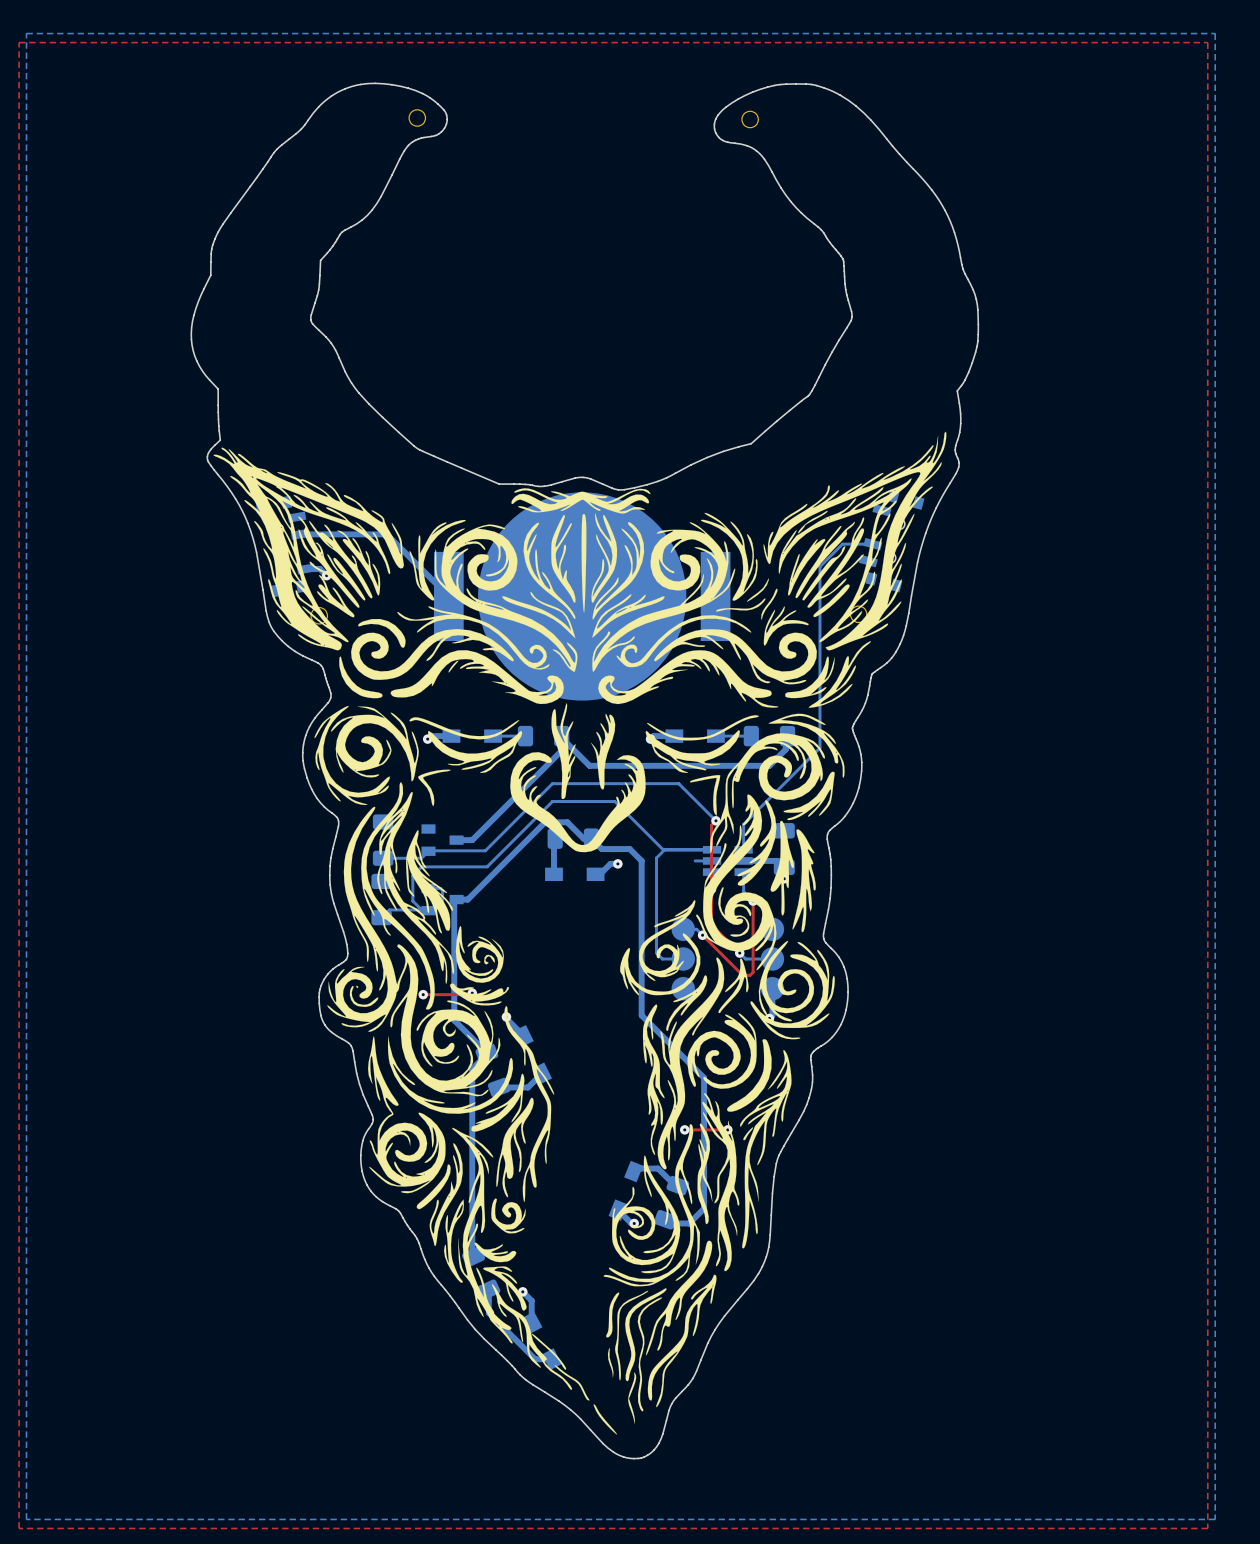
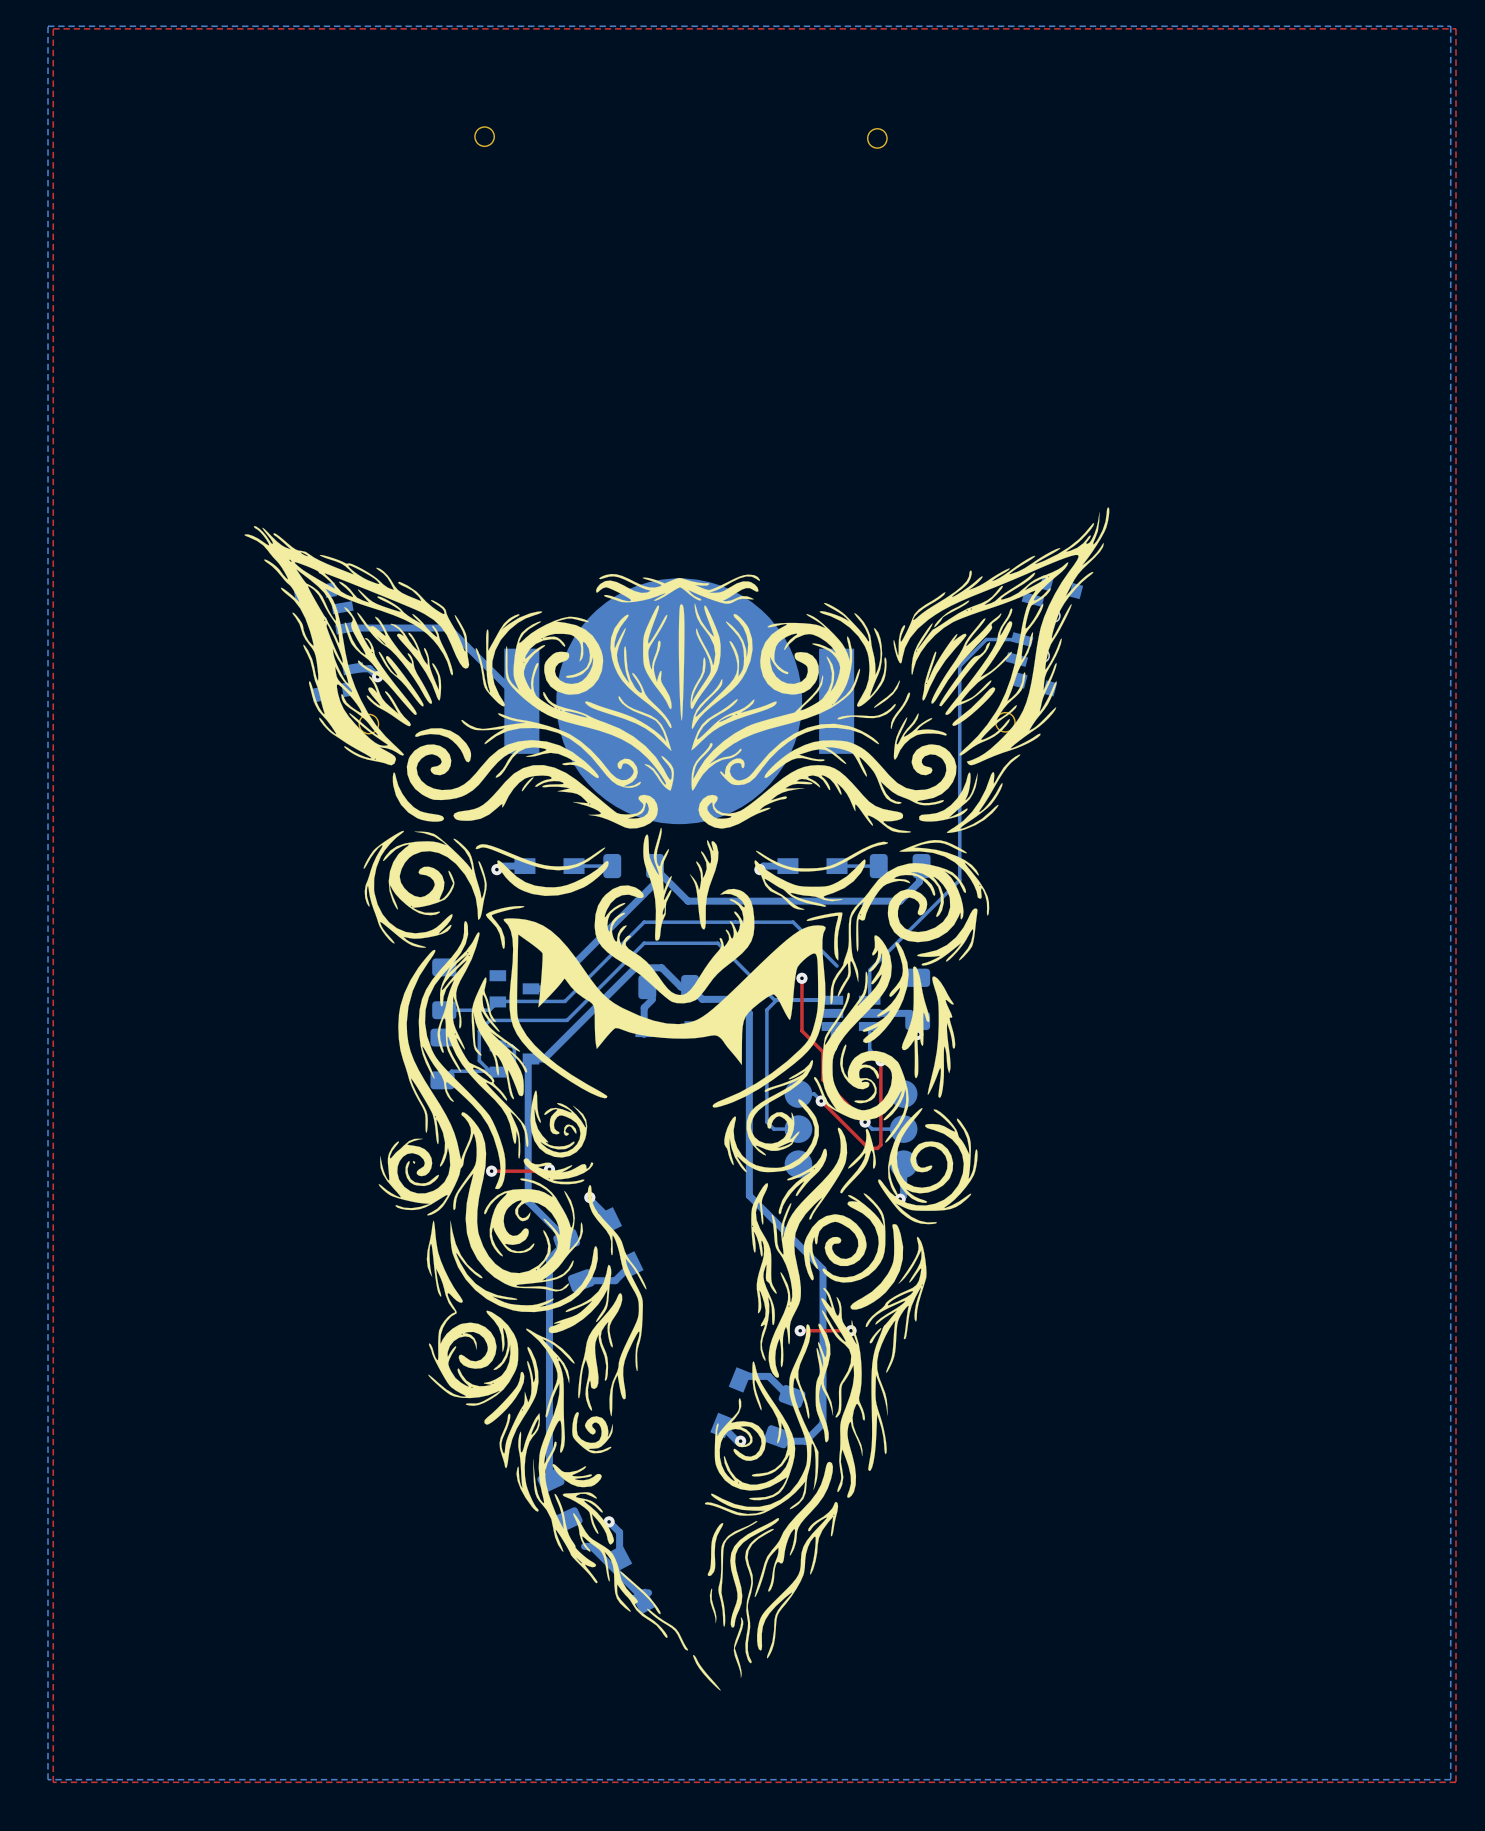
bottom zone outline: (26, 33) (26, 1519) (1215, 1519) (1215, 33) (26, 33) -> (47, 26) (47, 1779) (1450, 1779) (1450, 26) (47, 26)
top zone outline: (19, 42) (19, 1528) (1207, 1528) (1207, 42) (19, 42) -> (53, 28) (53, 1782) (1455, 1782) (1455, 28) (53, 28)
board edge: (375, 83) (360, 84) (345, 88) (321, 103) (300, 129) (273, 152) (216, 235) (211, 249) (210, 275) (195, 308) (191, 333) (192, 345) (196, 361) (206, 375) (218, 389) (220, 440) (209, 451) (207, 459) (235, 498) (247, 523) (256, 552) (266, 610) (271, 627) (288, 646) (321, 665) (330, 693) (328, 701) (314, 718) (307, 731) (302, 756) (307, 778) (314, 794) (338, 820) (330, 861) (330, 884) (333, 903) (345, 937) (347, 954) (345, 959) (333, 968) (324, 979) (319, 991) (319, 1003) (321, 1018) (326, 1027) (351, 1047) (359, 1084) (372, 1117) (372, 1122) (365, 1134) (361, 1147) (361, 1167) (365, 1181) (376, 1196) (399, 1211) (417, 1239) (431, 1272) (484, 1338) (525, 1379) (575, 1414) (608, 1448) (623, 1456) (639, 1458) (649, 1454) (656, 1446) (662, 1433) (671, 1403) (692, 1378) (715, 1329) (753, 1280) (762, 1266) (769, 1241) (776, 1163) (809, 1097) (812, 1078) (811, 1055) (834, 1034) (845, 1013) (848, 992) (845, 972) (838, 957) (823, 937) (831, 887) (830, 859) (827, 835) (829, 830) (847, 813) (856, 795) (860, 779) (861, 762) (852, 726) (865, 703) (871, 674) (891, 657) (902, 639) (917, 562) (925, 533) (936, 507) (958, 467) (955, 449) (960, 423) (957, 390) (968, 372) (977, 346) (978, 324) (976, 299) (963, 269) (952, 226) (942, 205) (927, 184) (863, 112) (840, 95) (814, 84) (780, 84) (752, 92) (732, 102) (719, 112) (714, 122) (716, 133) (724, 141) (746, 145) (760, 154) (790, 201) (821, 229) (843, 260) (845, 289) (851, 318) (809, 394) (751, 443) (707, 457) (666, 477) (647, 484) (618, 489) (588, 478) (581, 477) (544, 486) (499, 484) (414, 446) (358, 392) (348, 377) (333, 346) (311, 321) (310, 316) (319, 287) (320, 260) (341, 232) (362, 219) (371, 210) (408, 145) (418, 139) (437, 134) (446, 123) (444, 111) (426, 95) (400, 86) (375, 83) -> none
drawing shape: [213, 431, 947, 1435] -> [244, 507, 1110, 1691]
top track: (715, 820) (711, 825) (711, 924) -> (801, 978) (801, 1030) (823, 1051) (823, 1080) (831, 1088)
via position: (715, 820) -> (801, 978)
bottom track: (556, 843) (553, 846) (553, 872) -> none
bottom track: none -> (652, 999) (644, 1007) (644, 1034)
bottom track: (695, 860) (712, 860) -> none
bottom track: (617, 863) (610, 863) (598, 875) -> none
bottom track: (488, 1289) (488, 1312) (535, 1359) (551, 1359) -> none
bottom track: none -> (584, 1546) (591, 1546) (637, 1592) (648, 1592)

